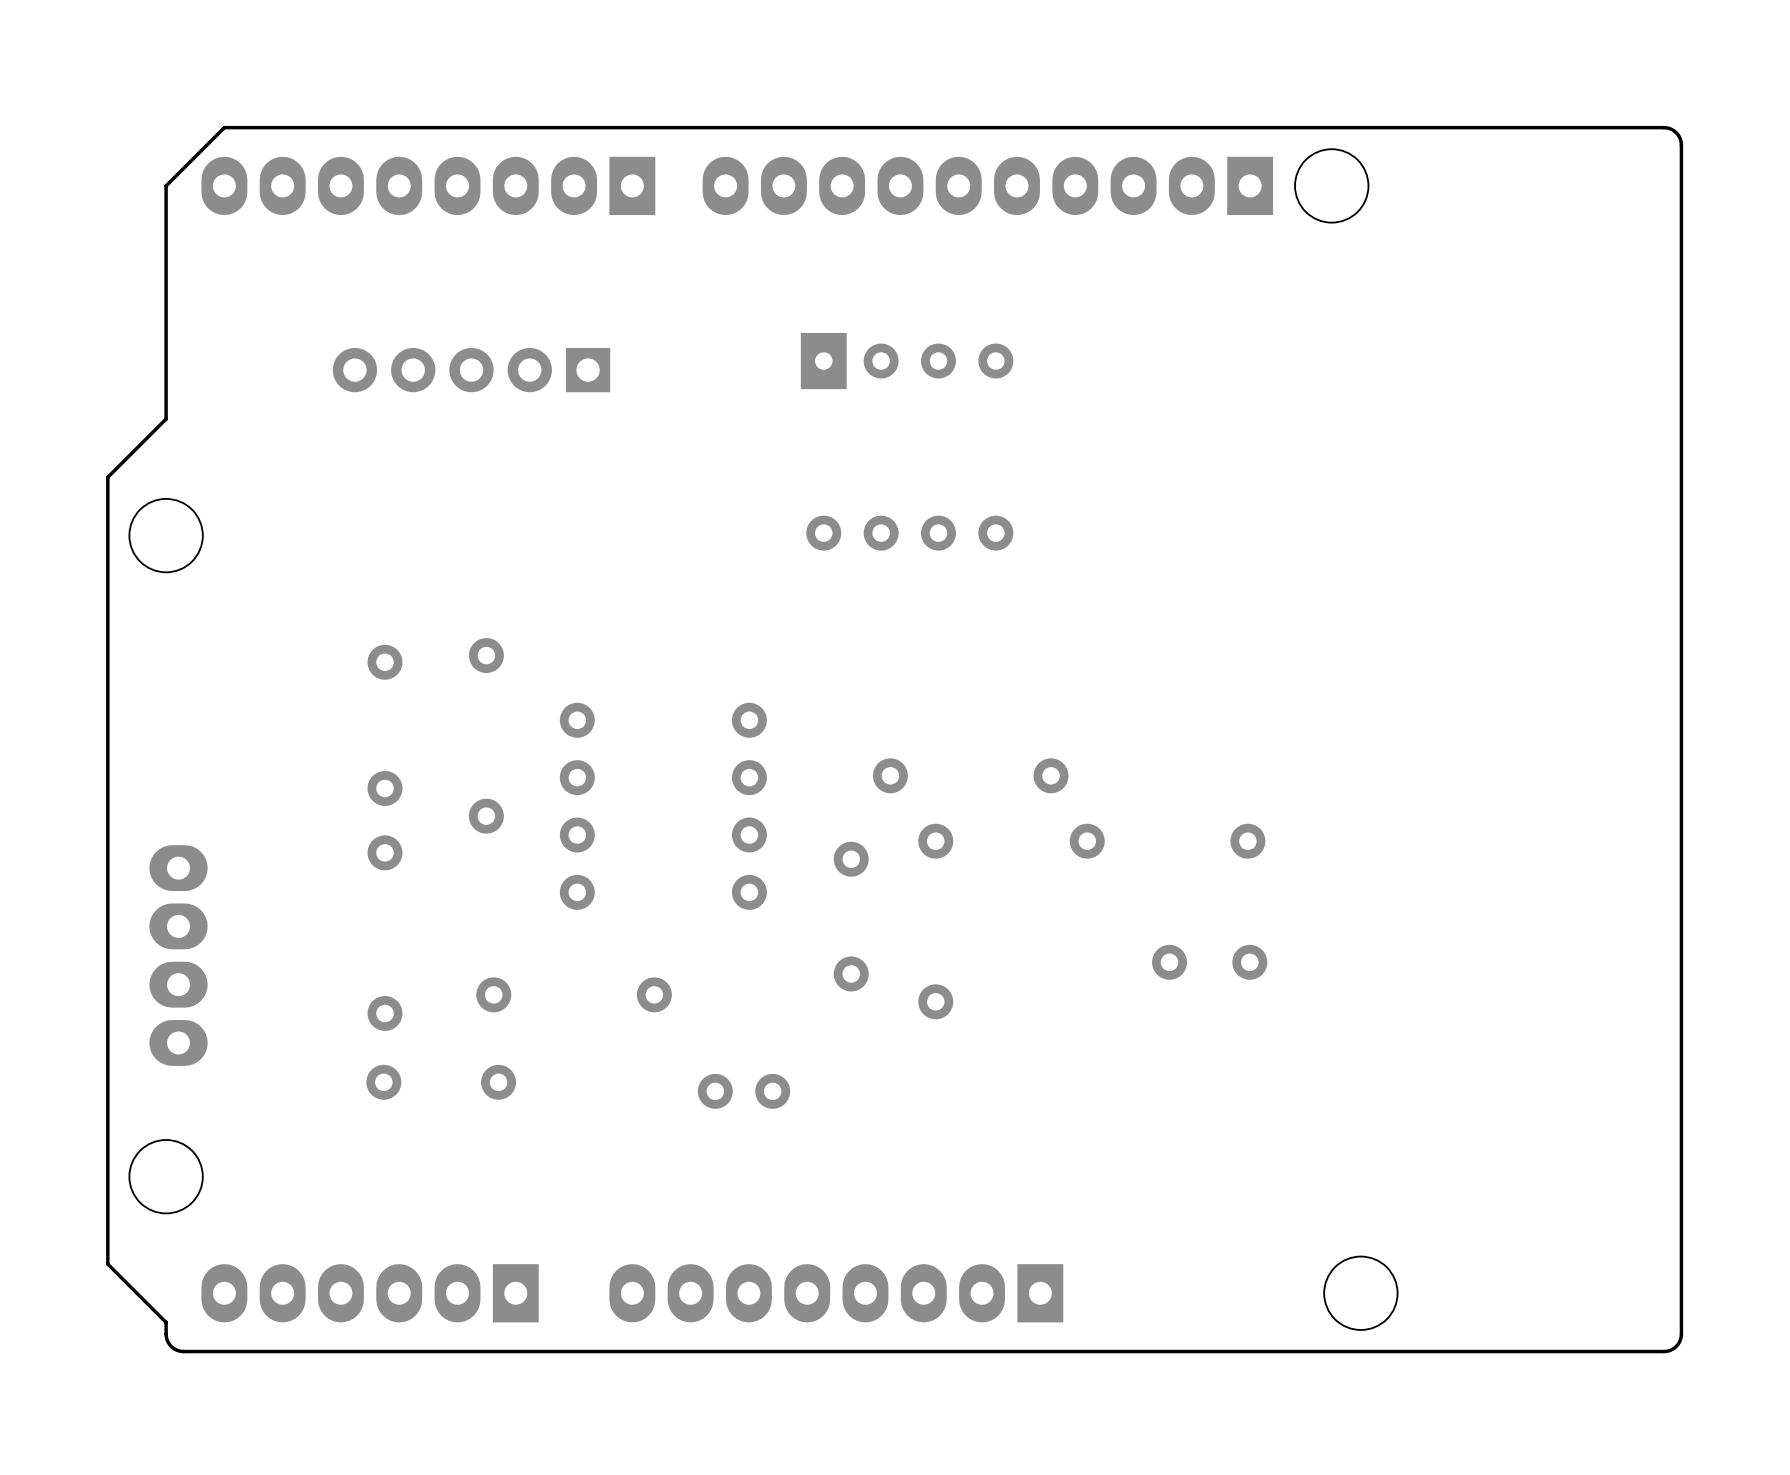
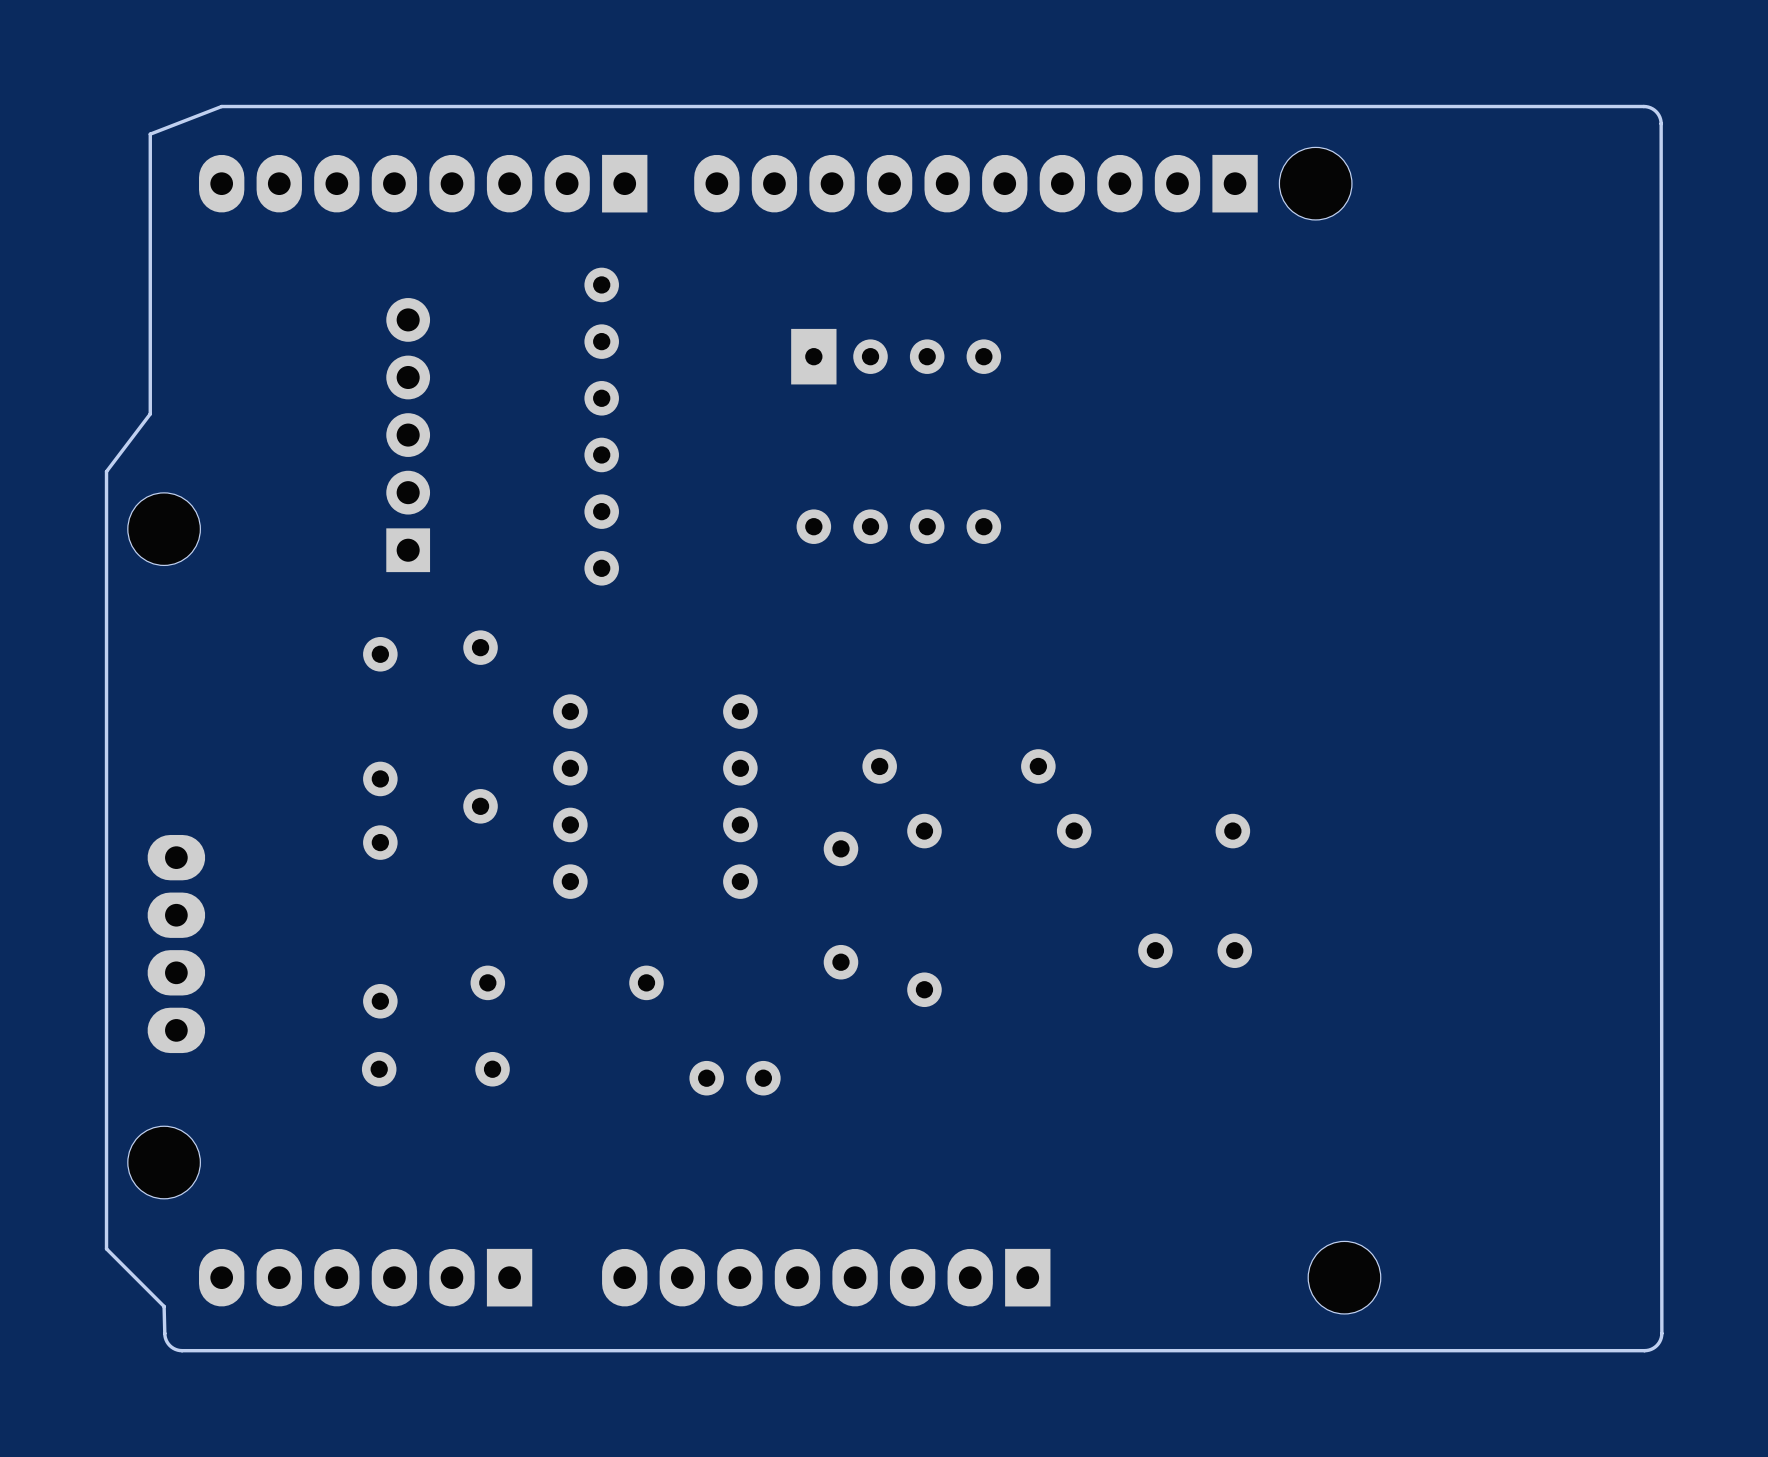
part rotation: 0° (471, 370) -> 90° clockwise (408, 435)
part: none -> (601, 426)
board edge: (107, 477) (166, 419) (166, 185) (224, 127) (1663, 127) (1674, 131) (1680, 140) (1681, 1334) (1679, 1342) (1674, 1347) (1663, 1351) (183, 1351) (174, 1349) (168, 1342) (166, 1322) -> (106, 471) (150, 413) (150, 134) (221, 106) (1643, 106) (1654, 110) (1660, 119) (1661, 1333) (1659, 1342) (1655, 1347) (1644, 1350) (182, 1350) (171, 1347) (166, 1340) (164, 1306)

